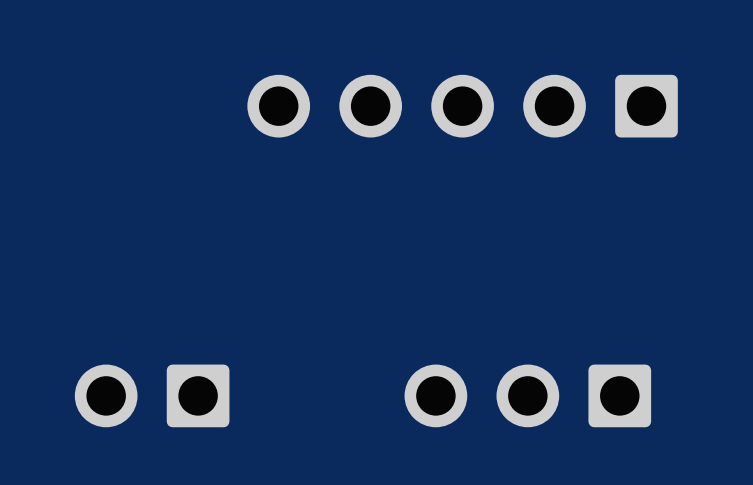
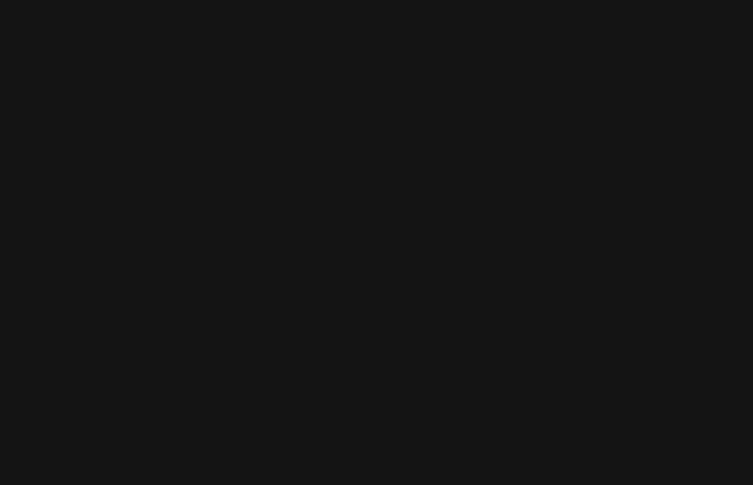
part: (462, 106) -> none
part: (152, 395) -> none
part: (527, 395) -> none

